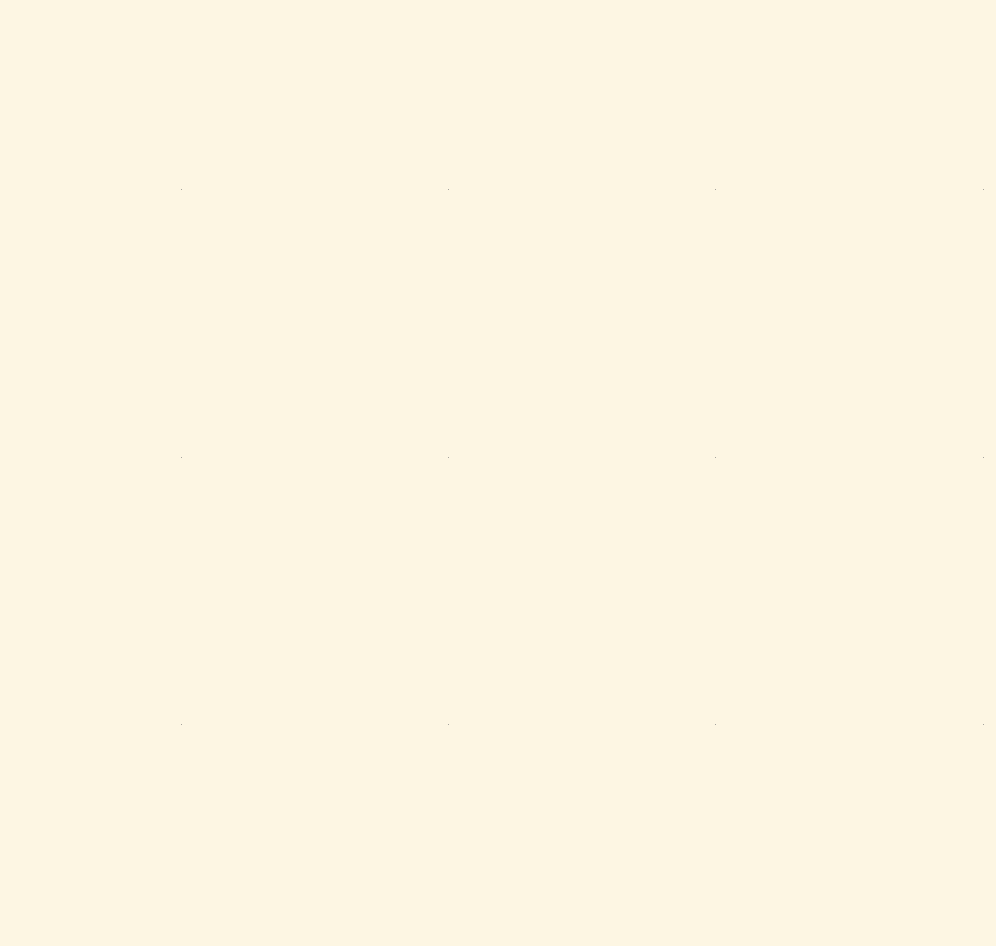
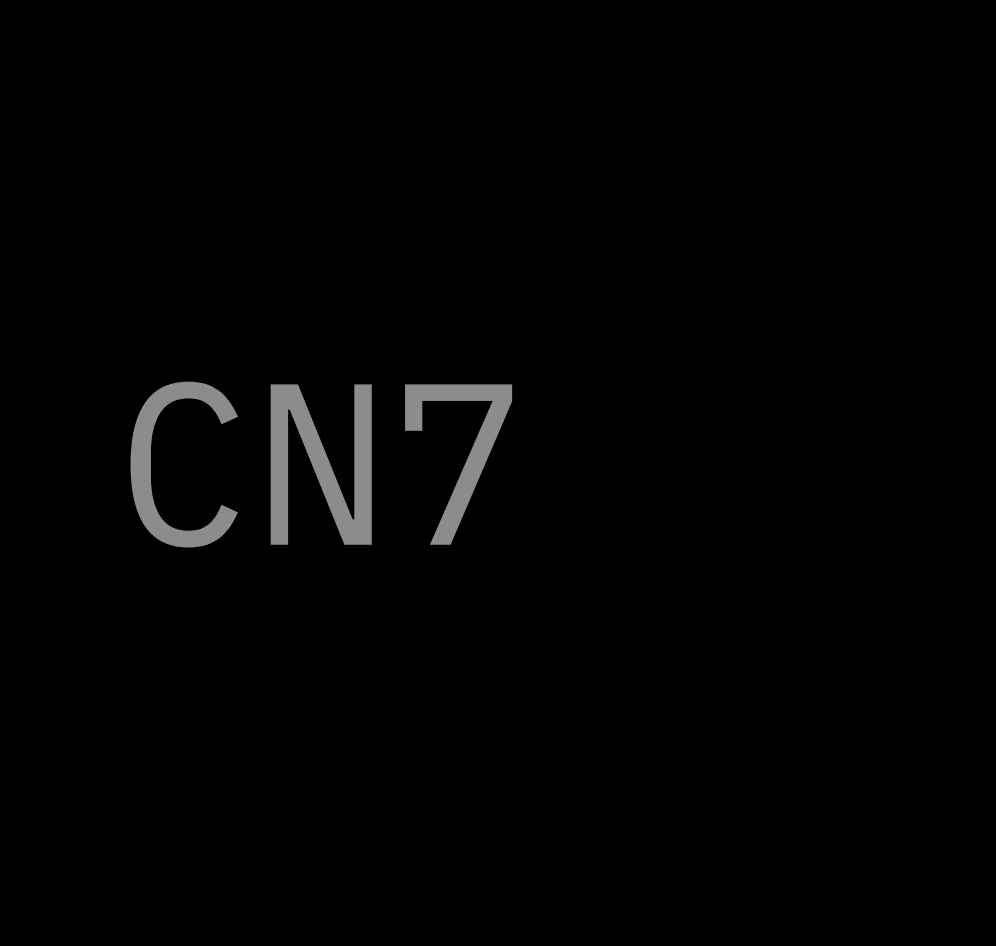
text: none -> CN7 (321, 464)

